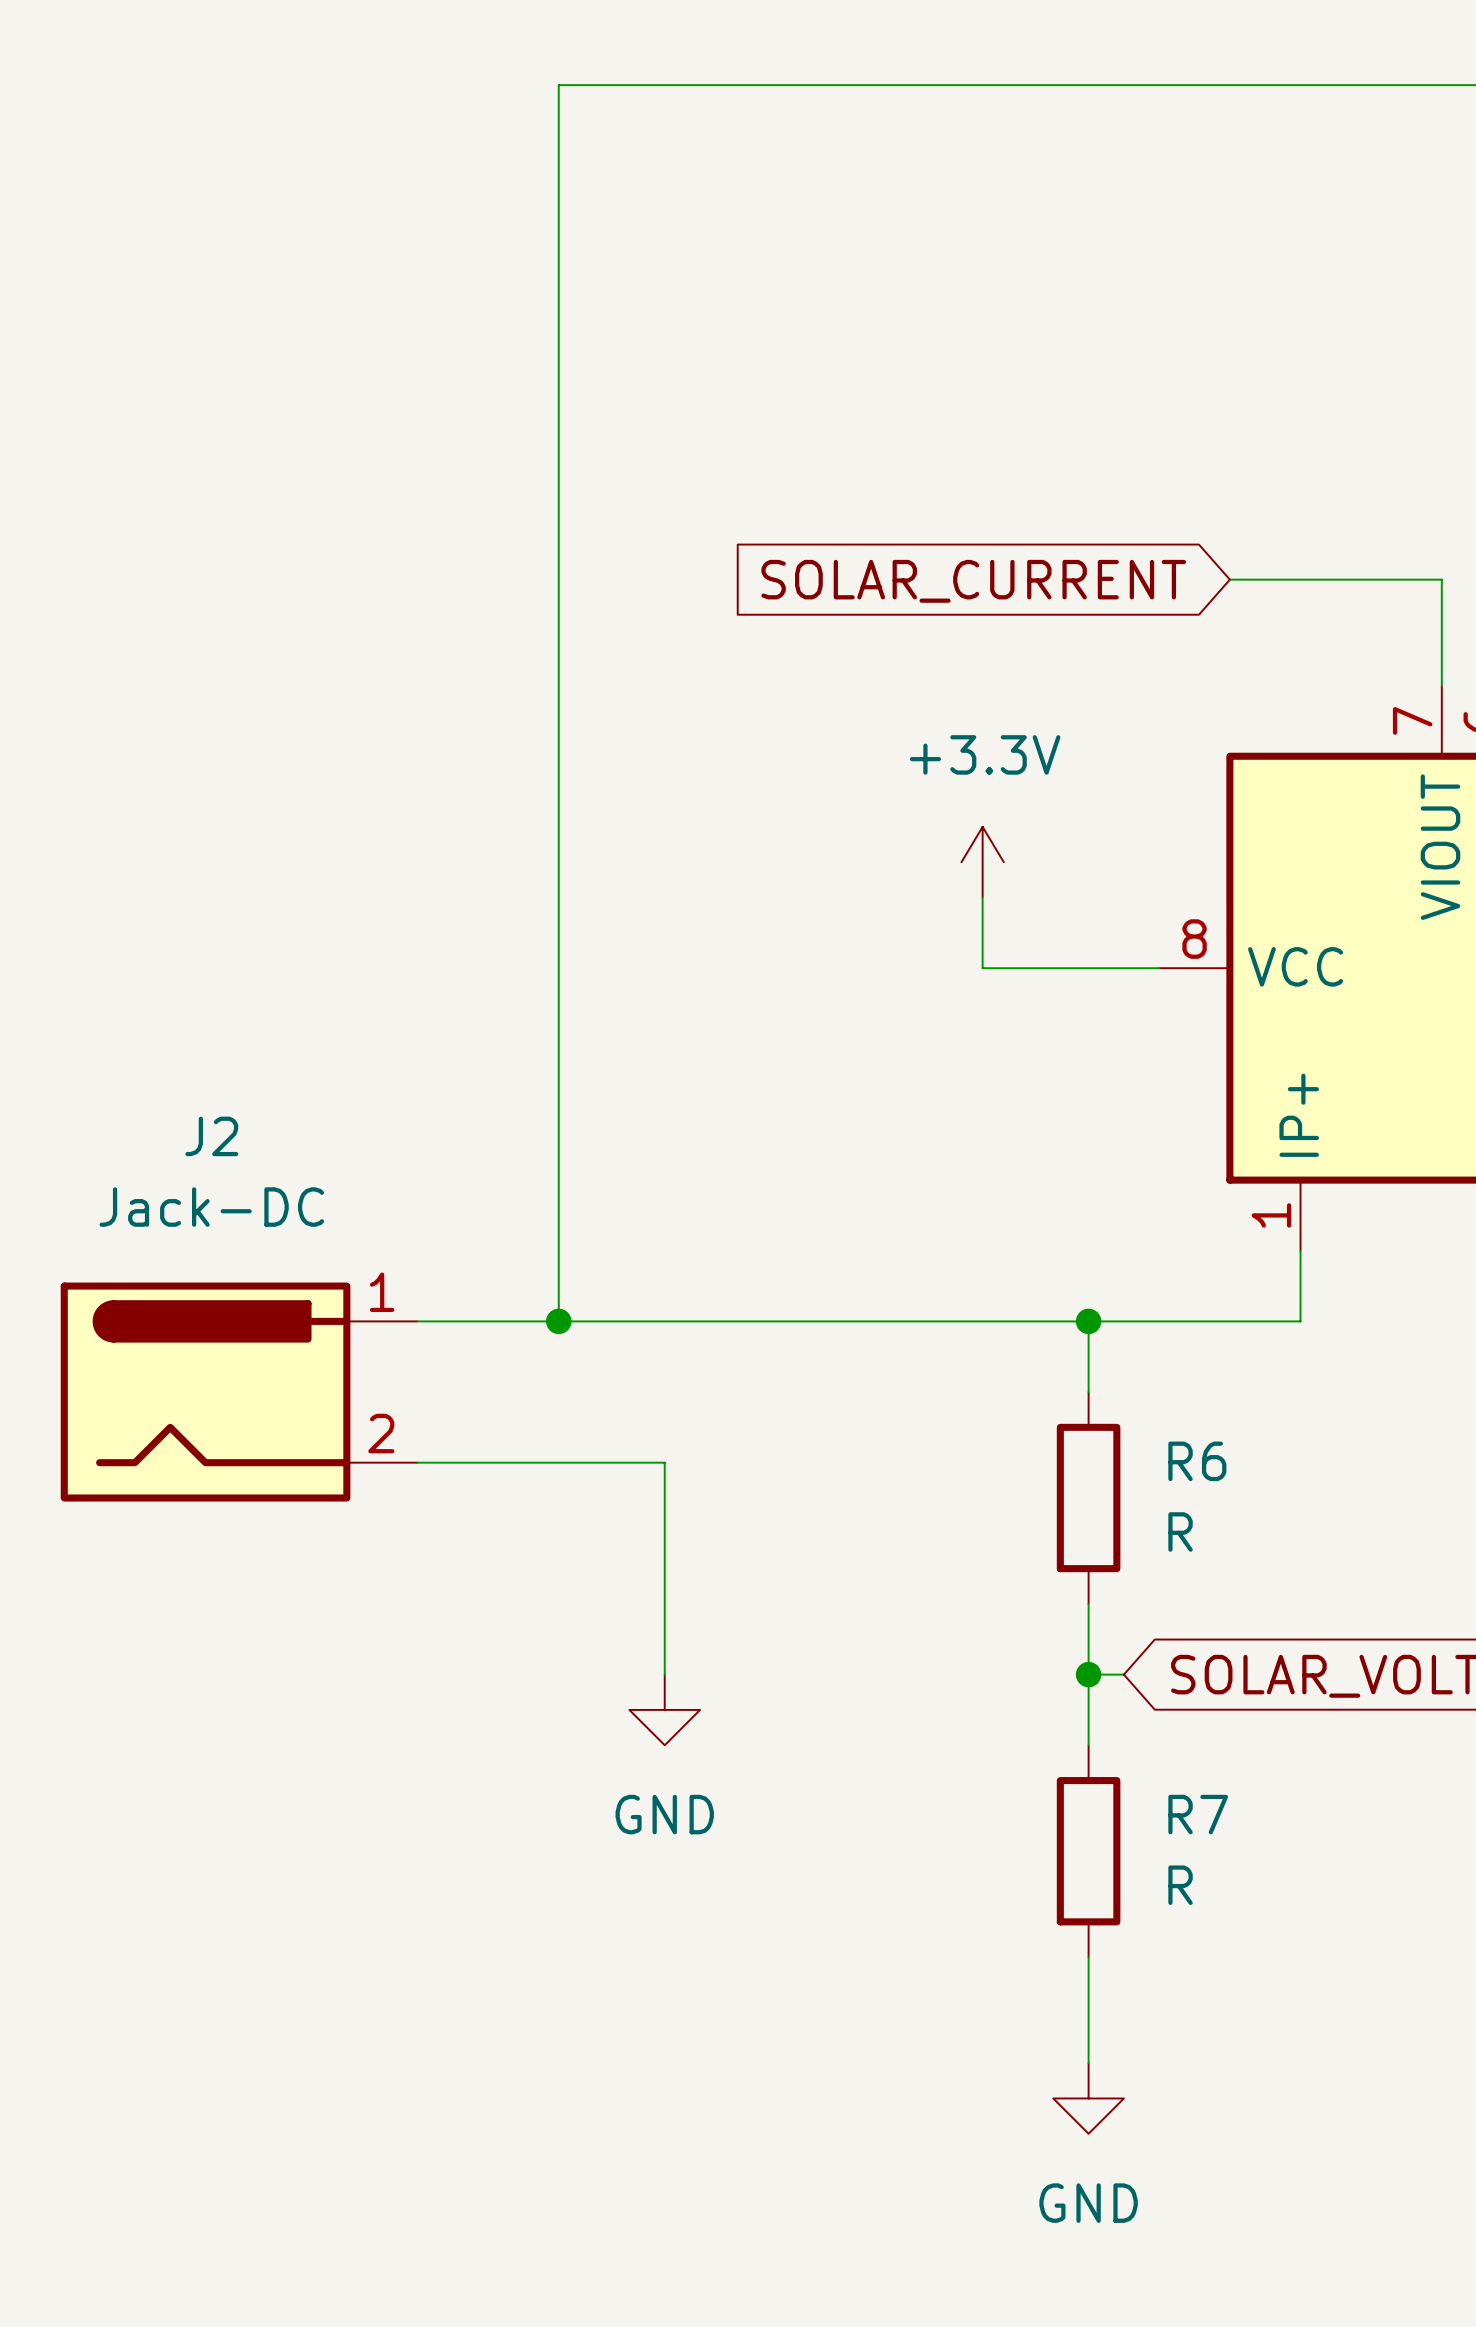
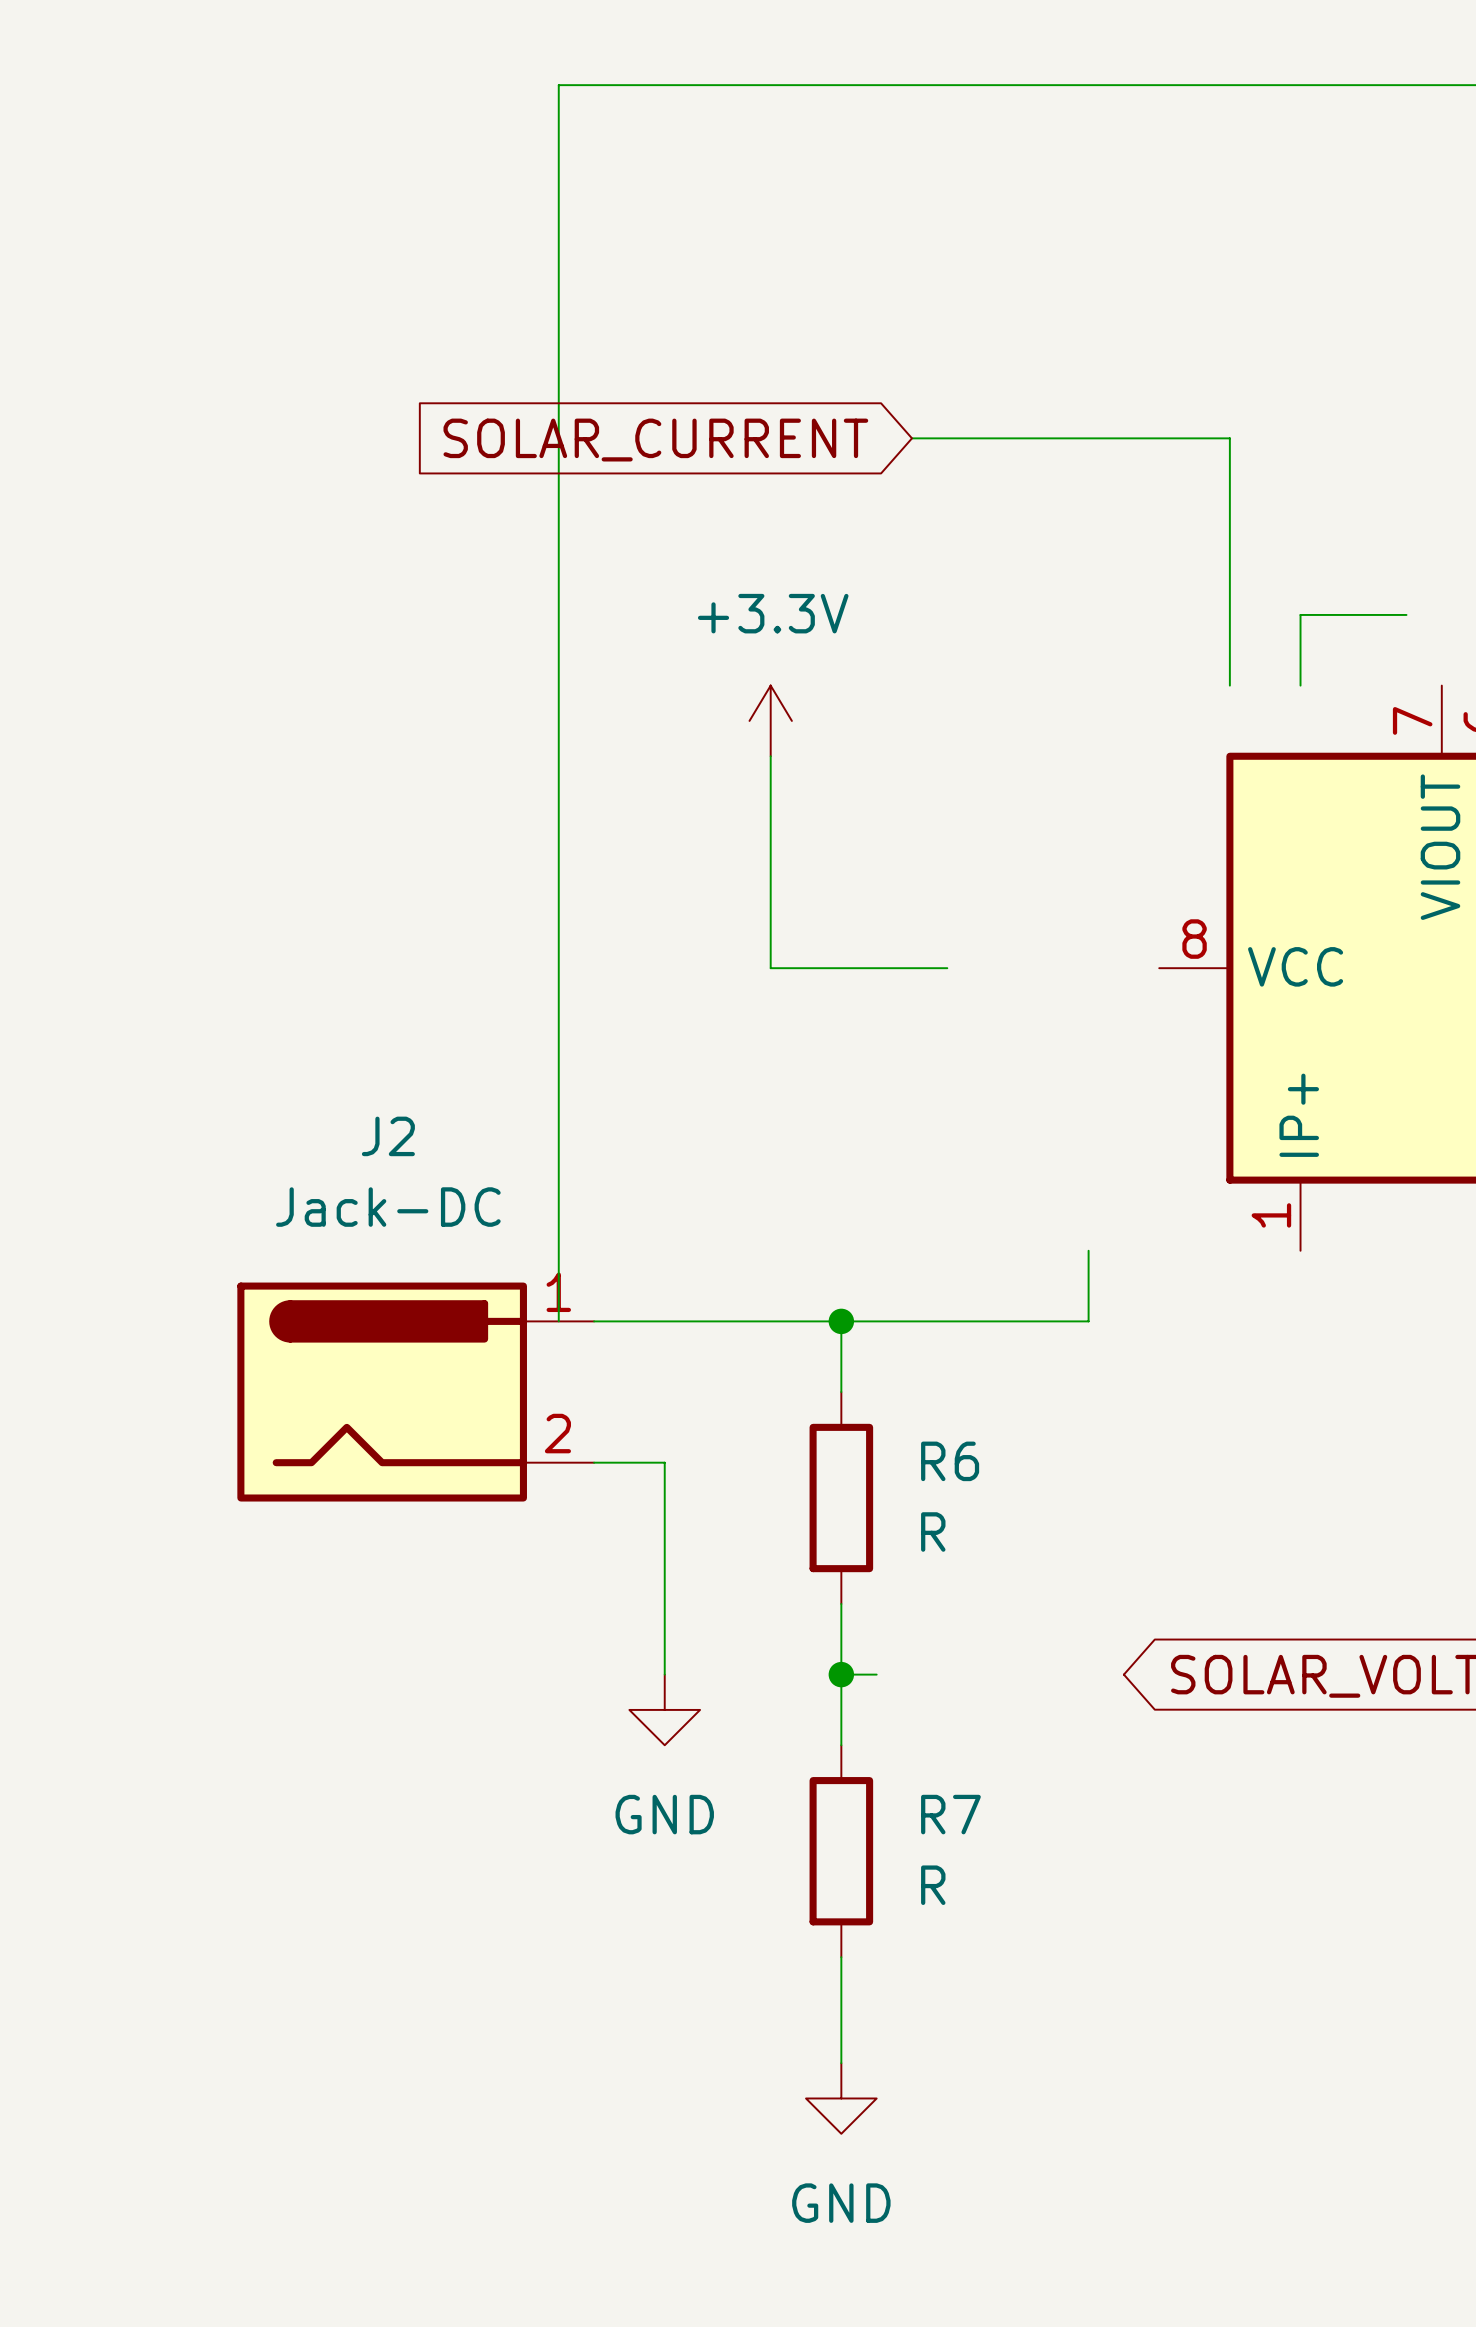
wire: none -> (911, 438) (1229, 438) (1229, 685)
wire: (1229, 579) (1441, 579) (1441, 685) -> none
global label position: SOLAR_CURRENT (973, 581) -> SOLAR_CURRENT (655, 440)
wire: none -> (1406, 614) (1300, 614) (1300, 685)
wire: none -> (770, 756) (770, 968) (947, 968)
power symbol position: +3.3V (982, 862) -> +3.3V (770, 720)
wire: (982, 897) (982, 968) (1159, 968) -> none
wire: none -> (1088, 1250) (1088, 1321)
wire: (1300, 1250) (1300, 1321) (1088, 1321) (1088, 1392) -> none
junction: (558, 1321) -> none
wire: none -> (841, 1321) (841, 1392)
junction: none -> (841, 1321)
junction: (1088, 1321) -> none
J2 position: (239, 1392) -> (415, 1392)
R6 position: (1088, 1498) -> (841, 1498)
wire: (1088, 1603) (1088, 1745) -> (841, 1603) (841, 1745)
junction: none -> (841, 1674)
wire: (1088, 1674) (1123, 1674) -> (841, 1674) (876, 1674)
junction: (1088, 1674) -> none
R7 position: (1088, 1851) -> (841, 1851)
wire: (1088, 1957) (1088, 2063) -> (841, 1957) (841, 2063)
power symbol position: GND (1088, 2098) -> GND (841, 2098)

